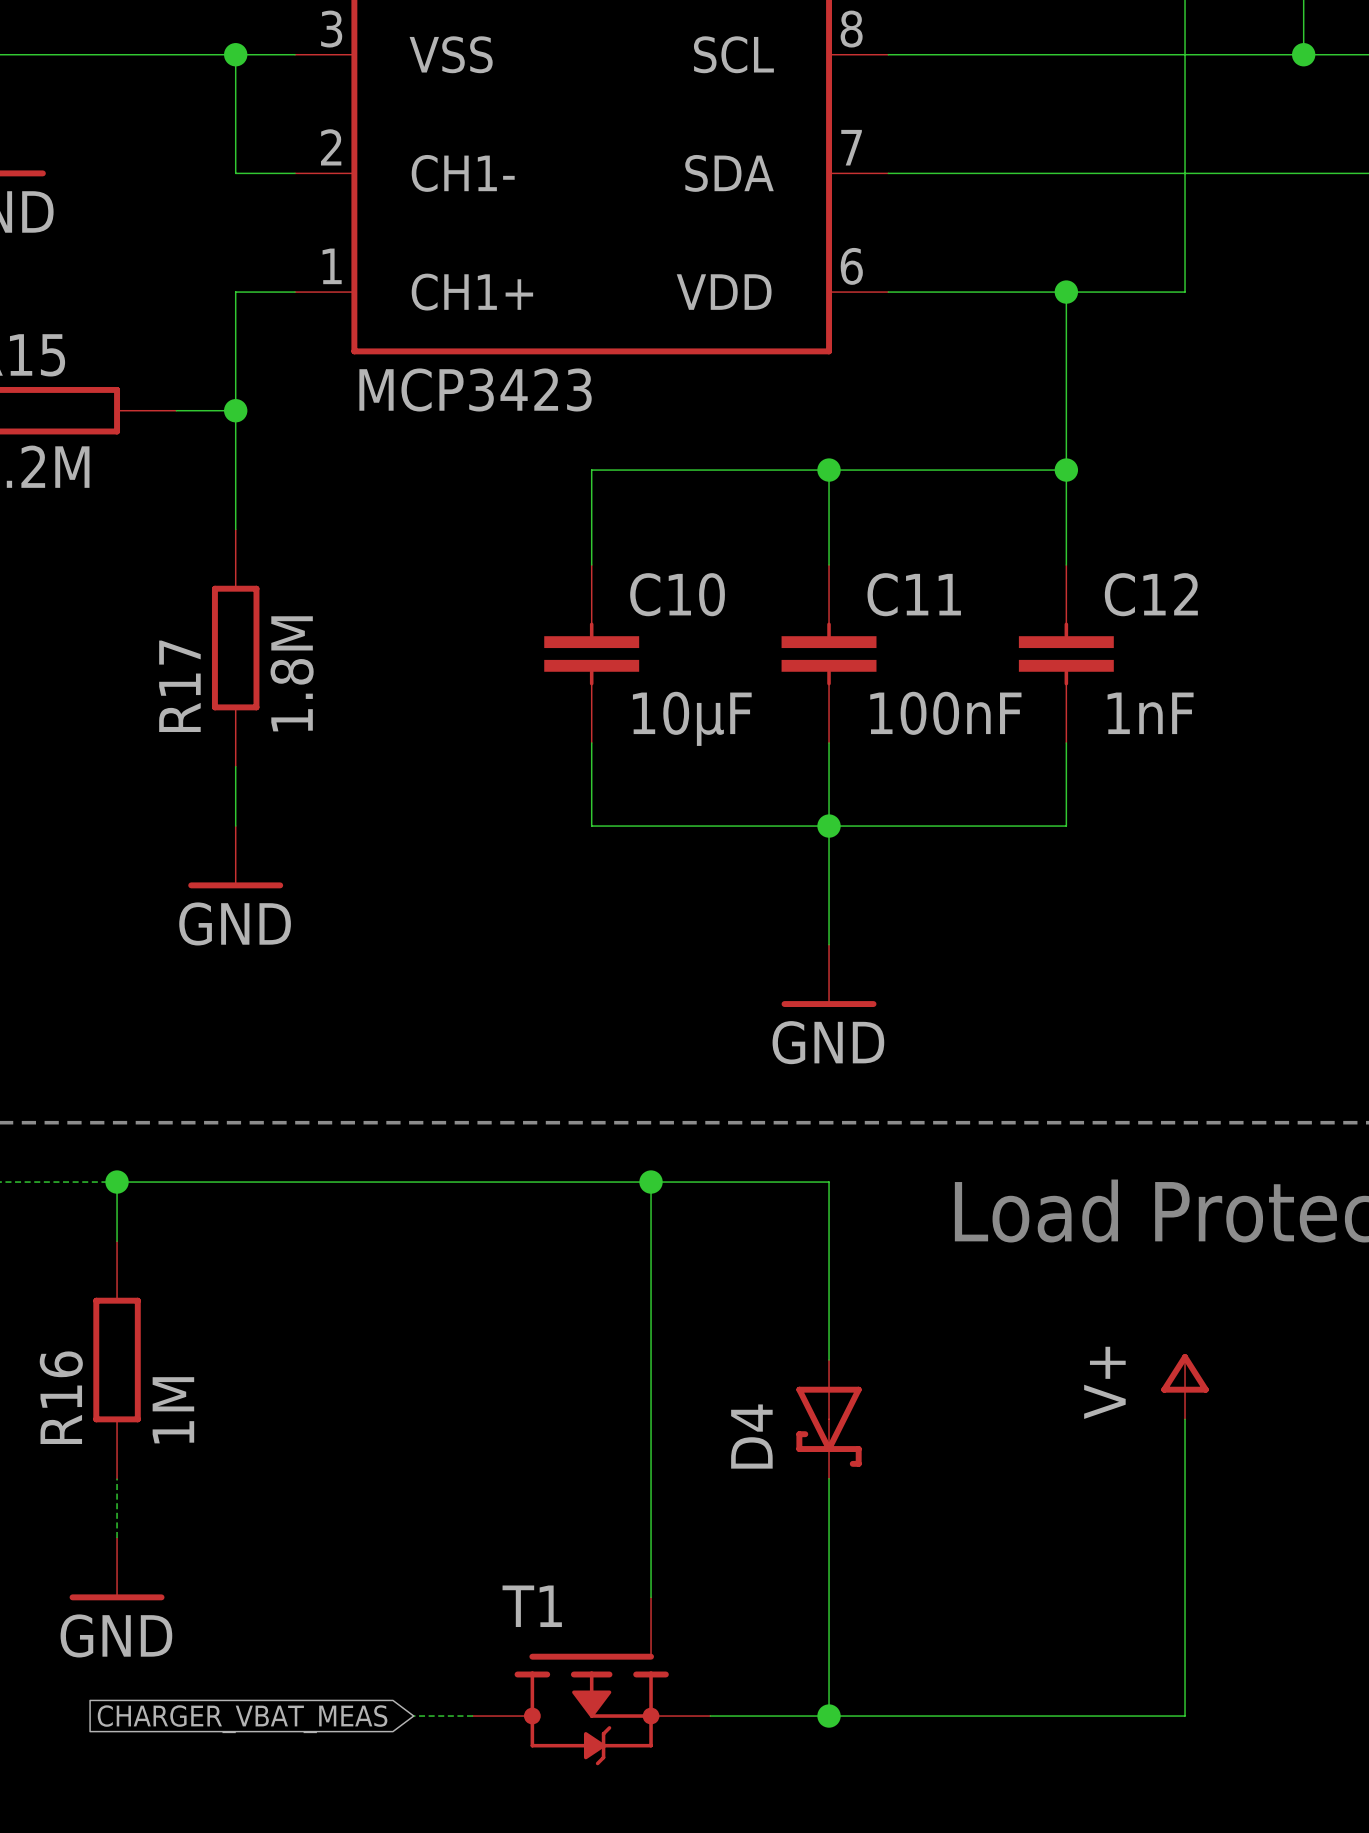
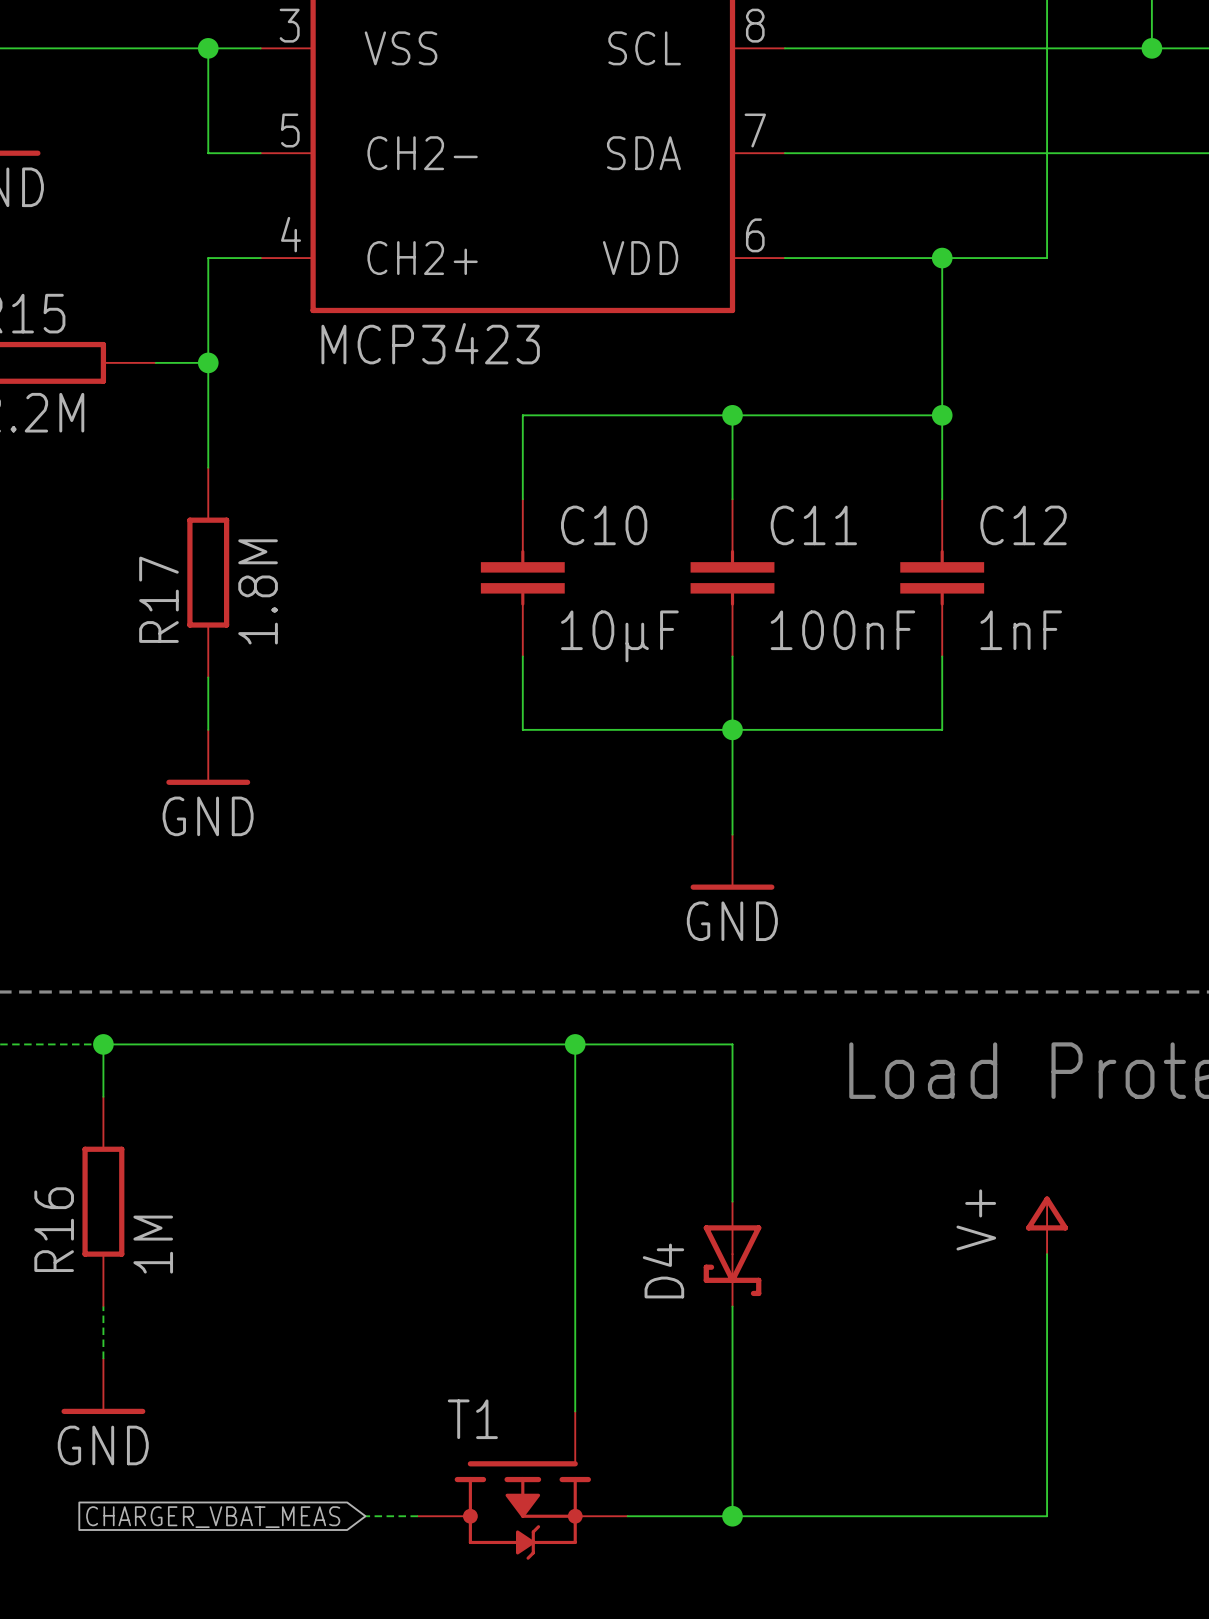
part pin number: 2 (331, 147) -> 5 (290, 130)
part pin name: CH1- (463, 173) -> CH2- (422, 153)
part pin number: 1 (332, 266) -> 4 (291, 234)
part pin name: CH1+ (472, 292) -> CH2+ (422, 258)

